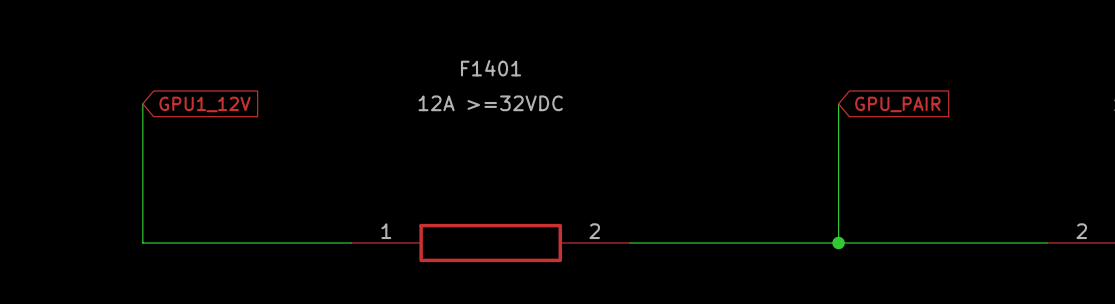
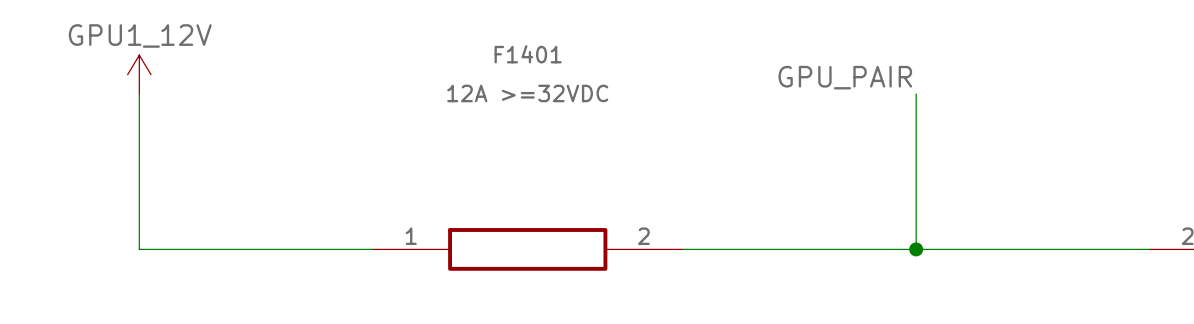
power symbol: none -> GPU1_12V (139, 74)
label: none -> GPU_PAIR (845, 77)
global label: GPU1_12V (205, 104) -> none
global label: GPU_PAIR (897, 104) -> none

